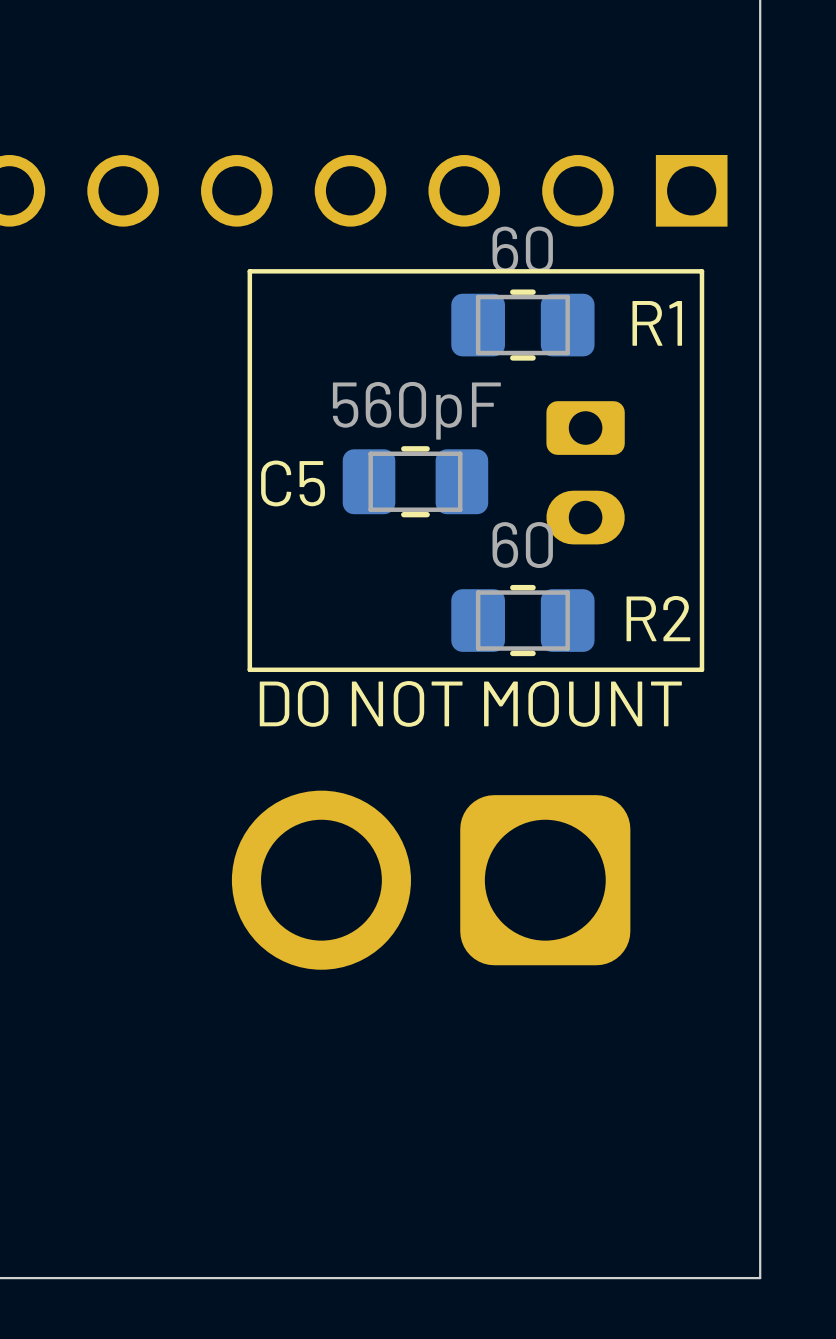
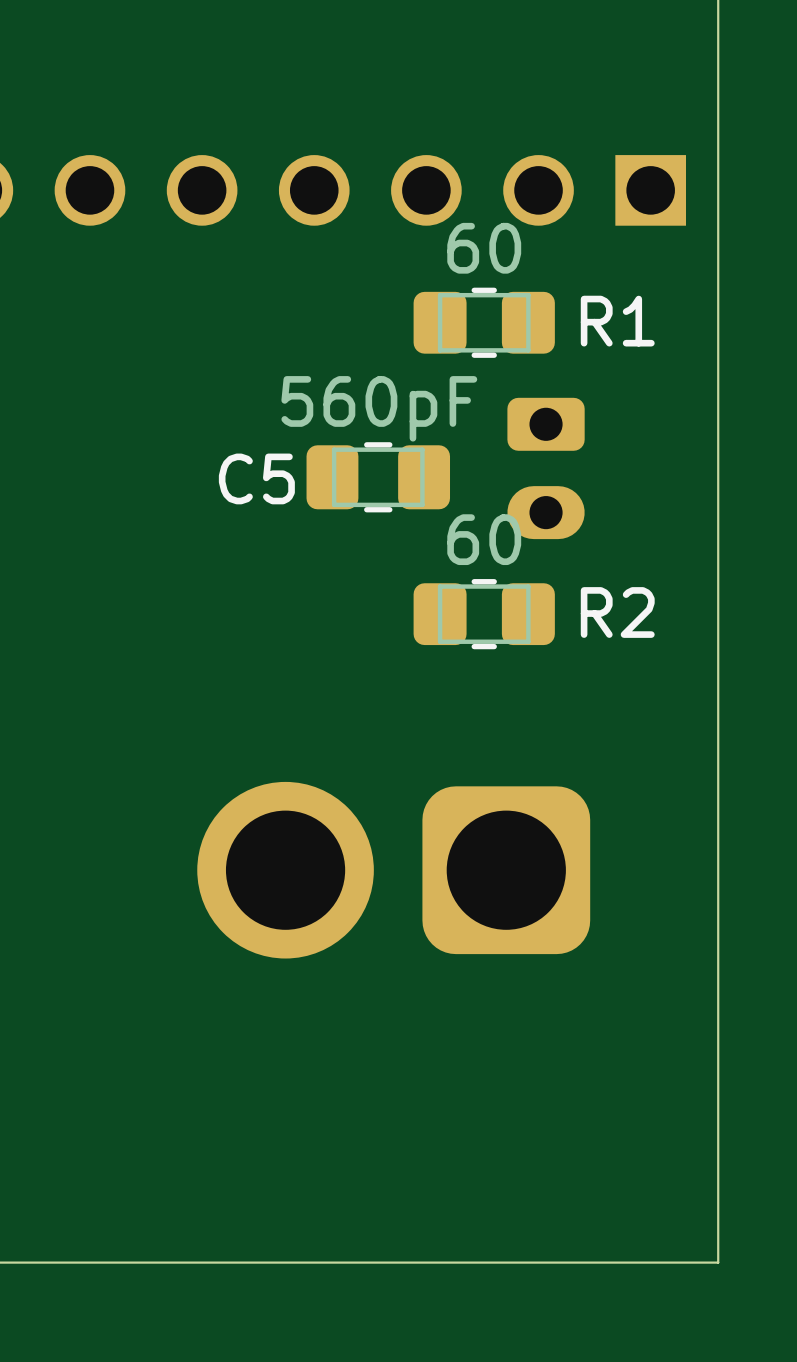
line: (701, 271) (249, 271) (249, 669) (701, 669) (701, 271) -> none
text: DO NOT MOUNT (470, 703) -> none

